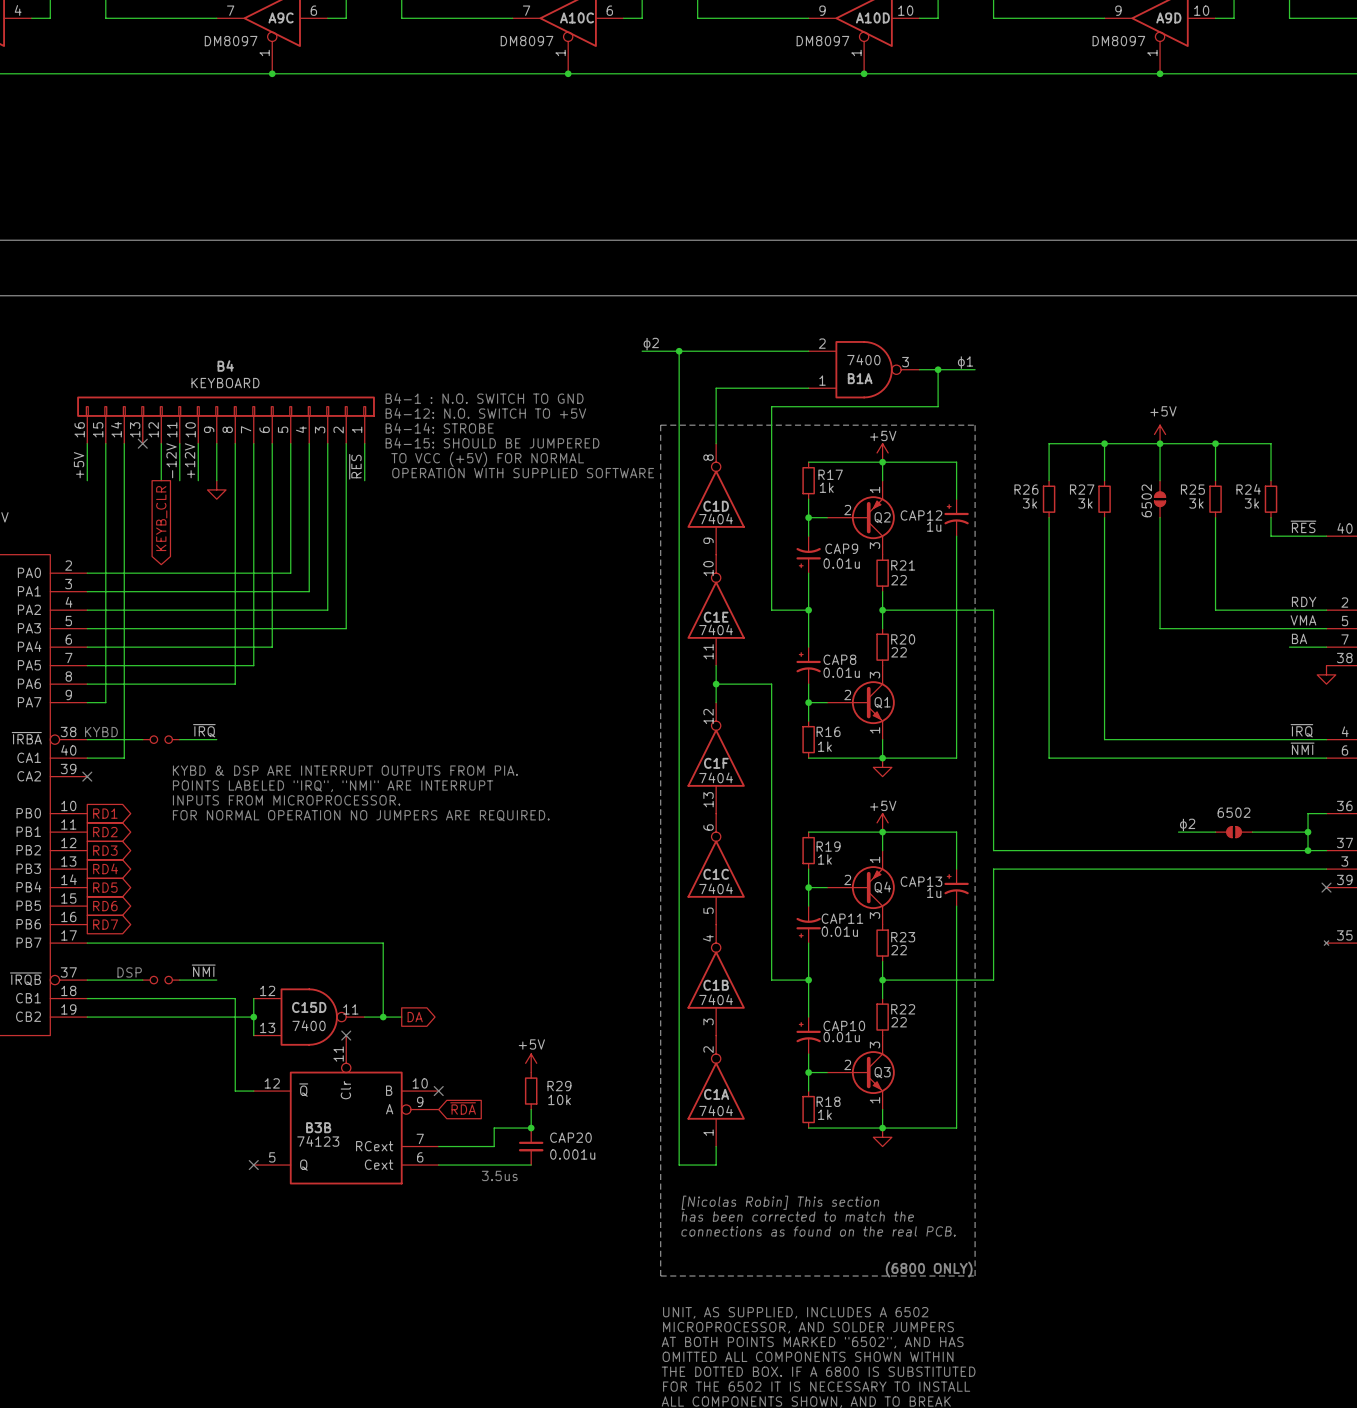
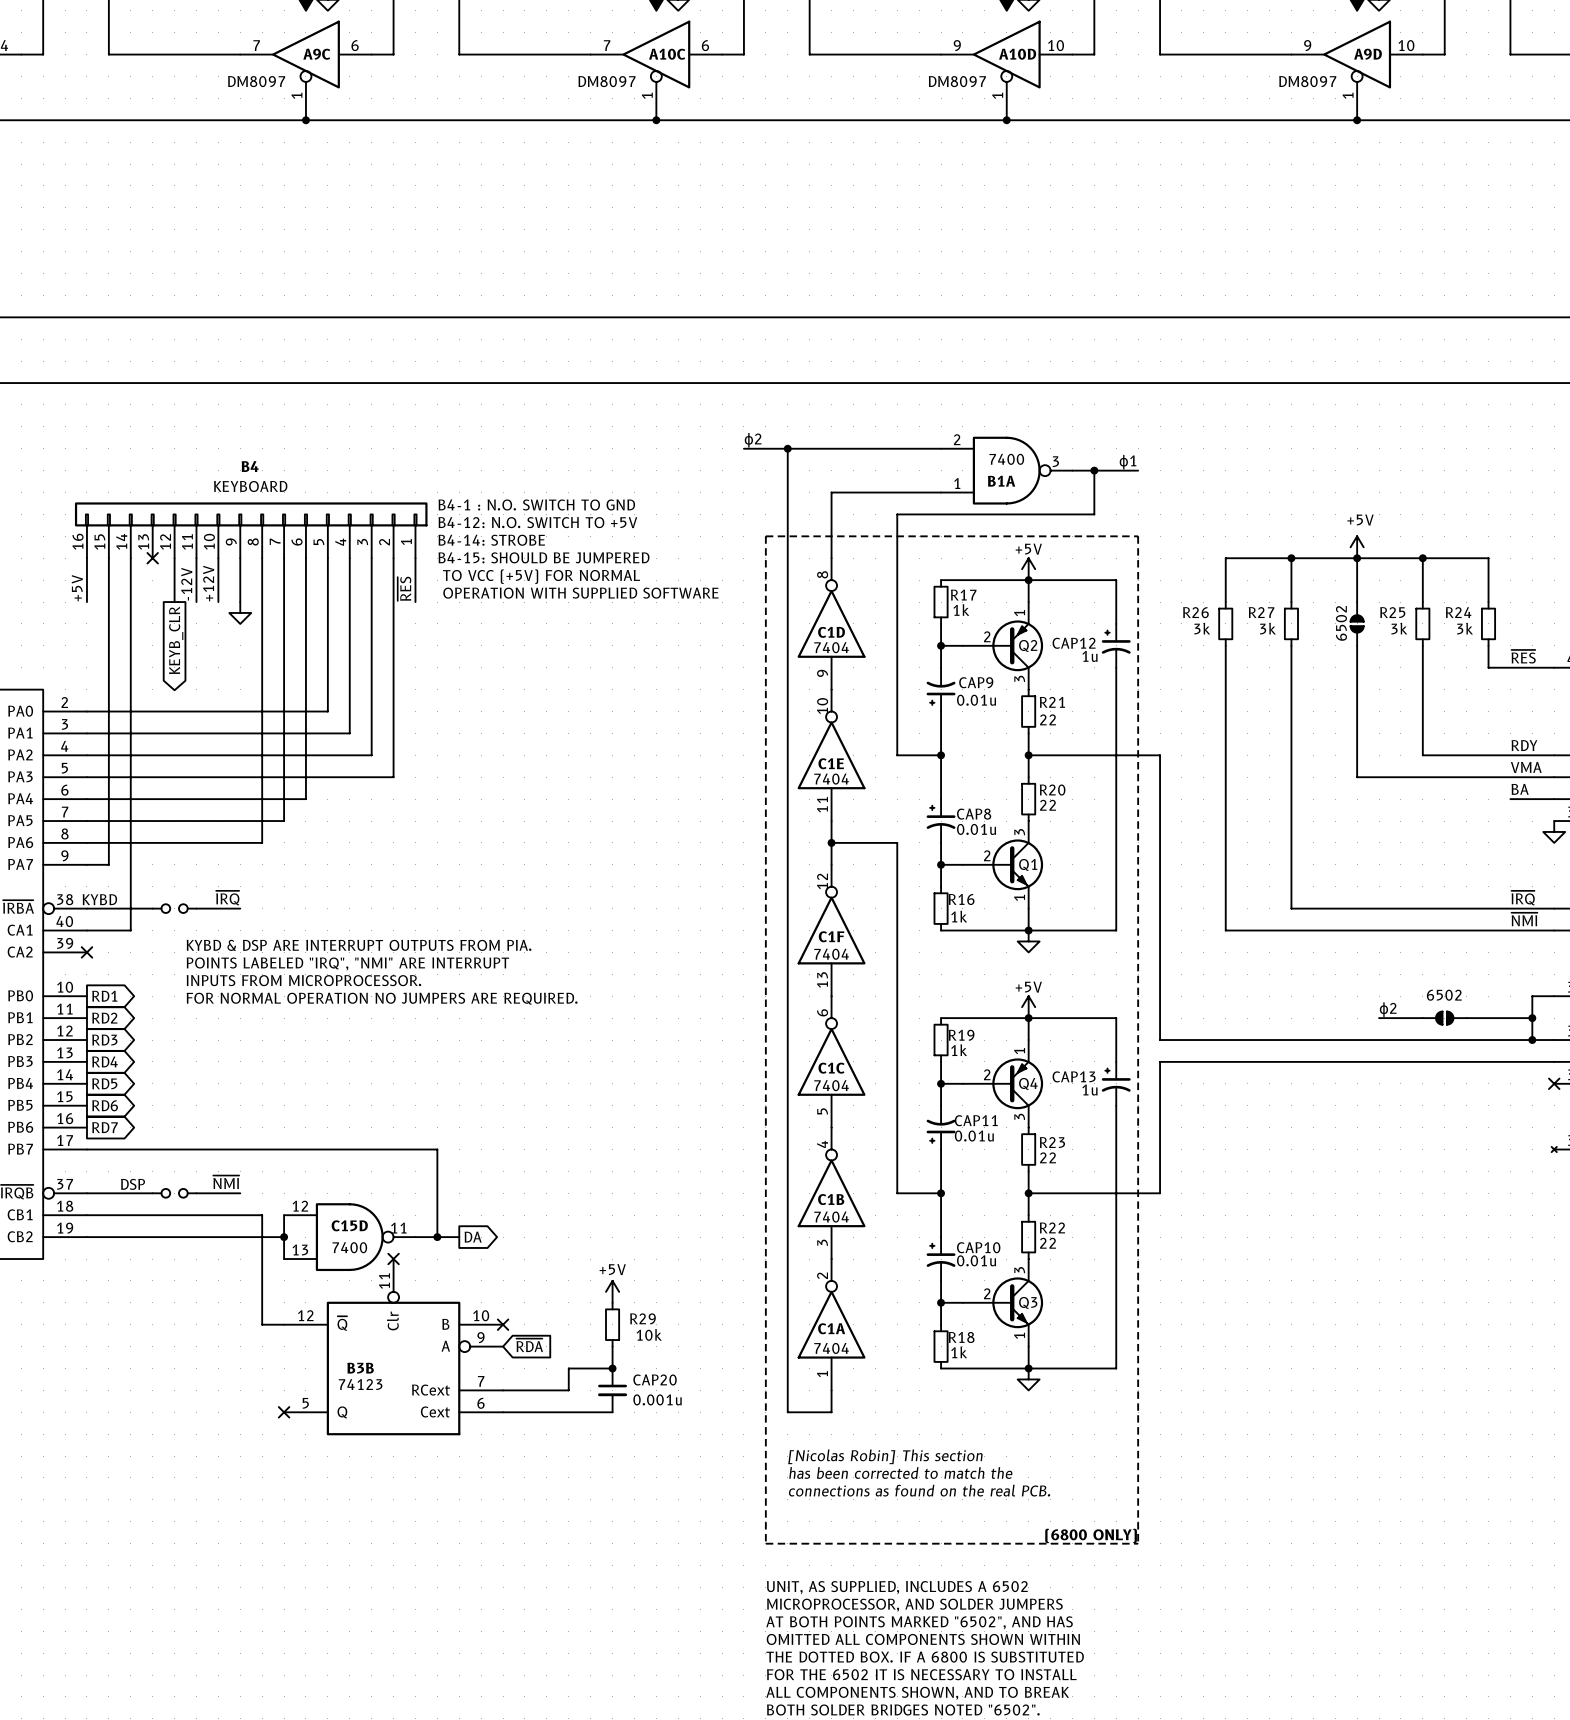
text: 3.5us (499, 1175) -> none

